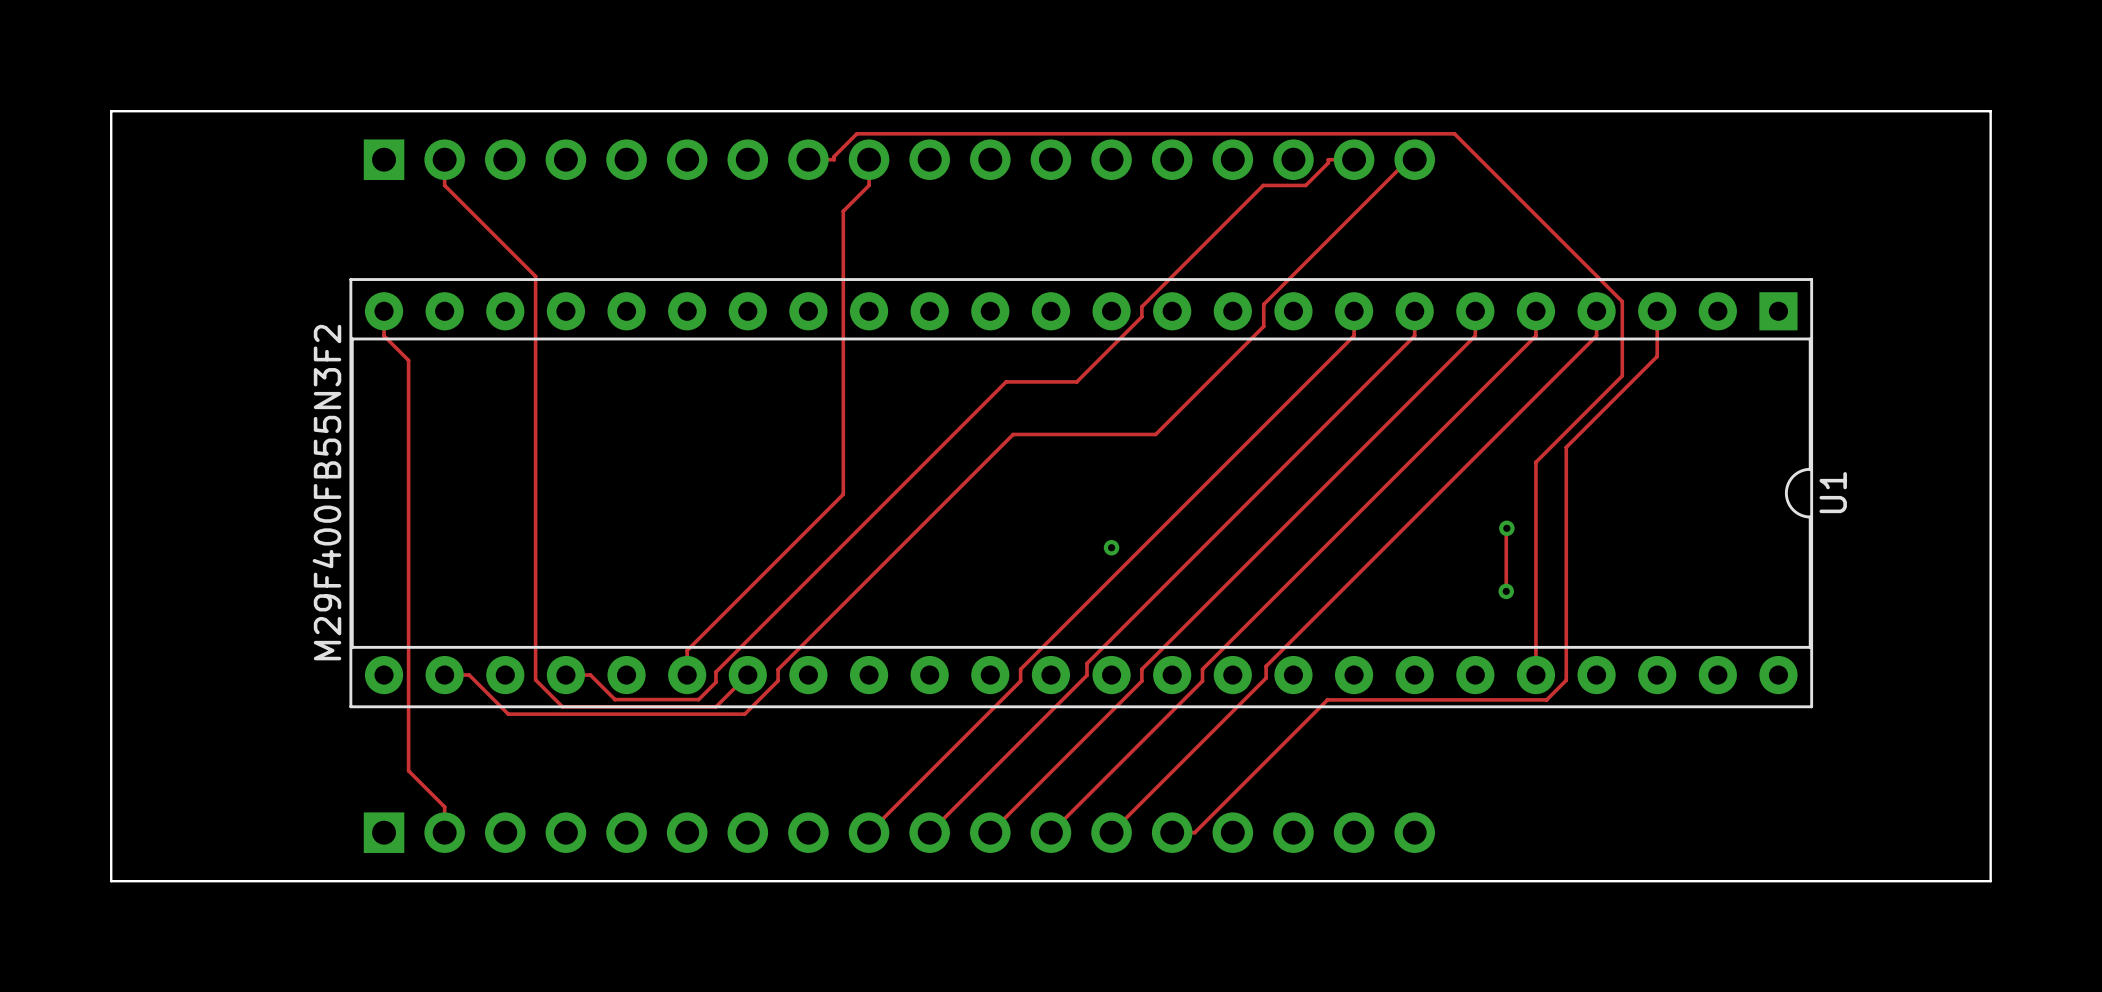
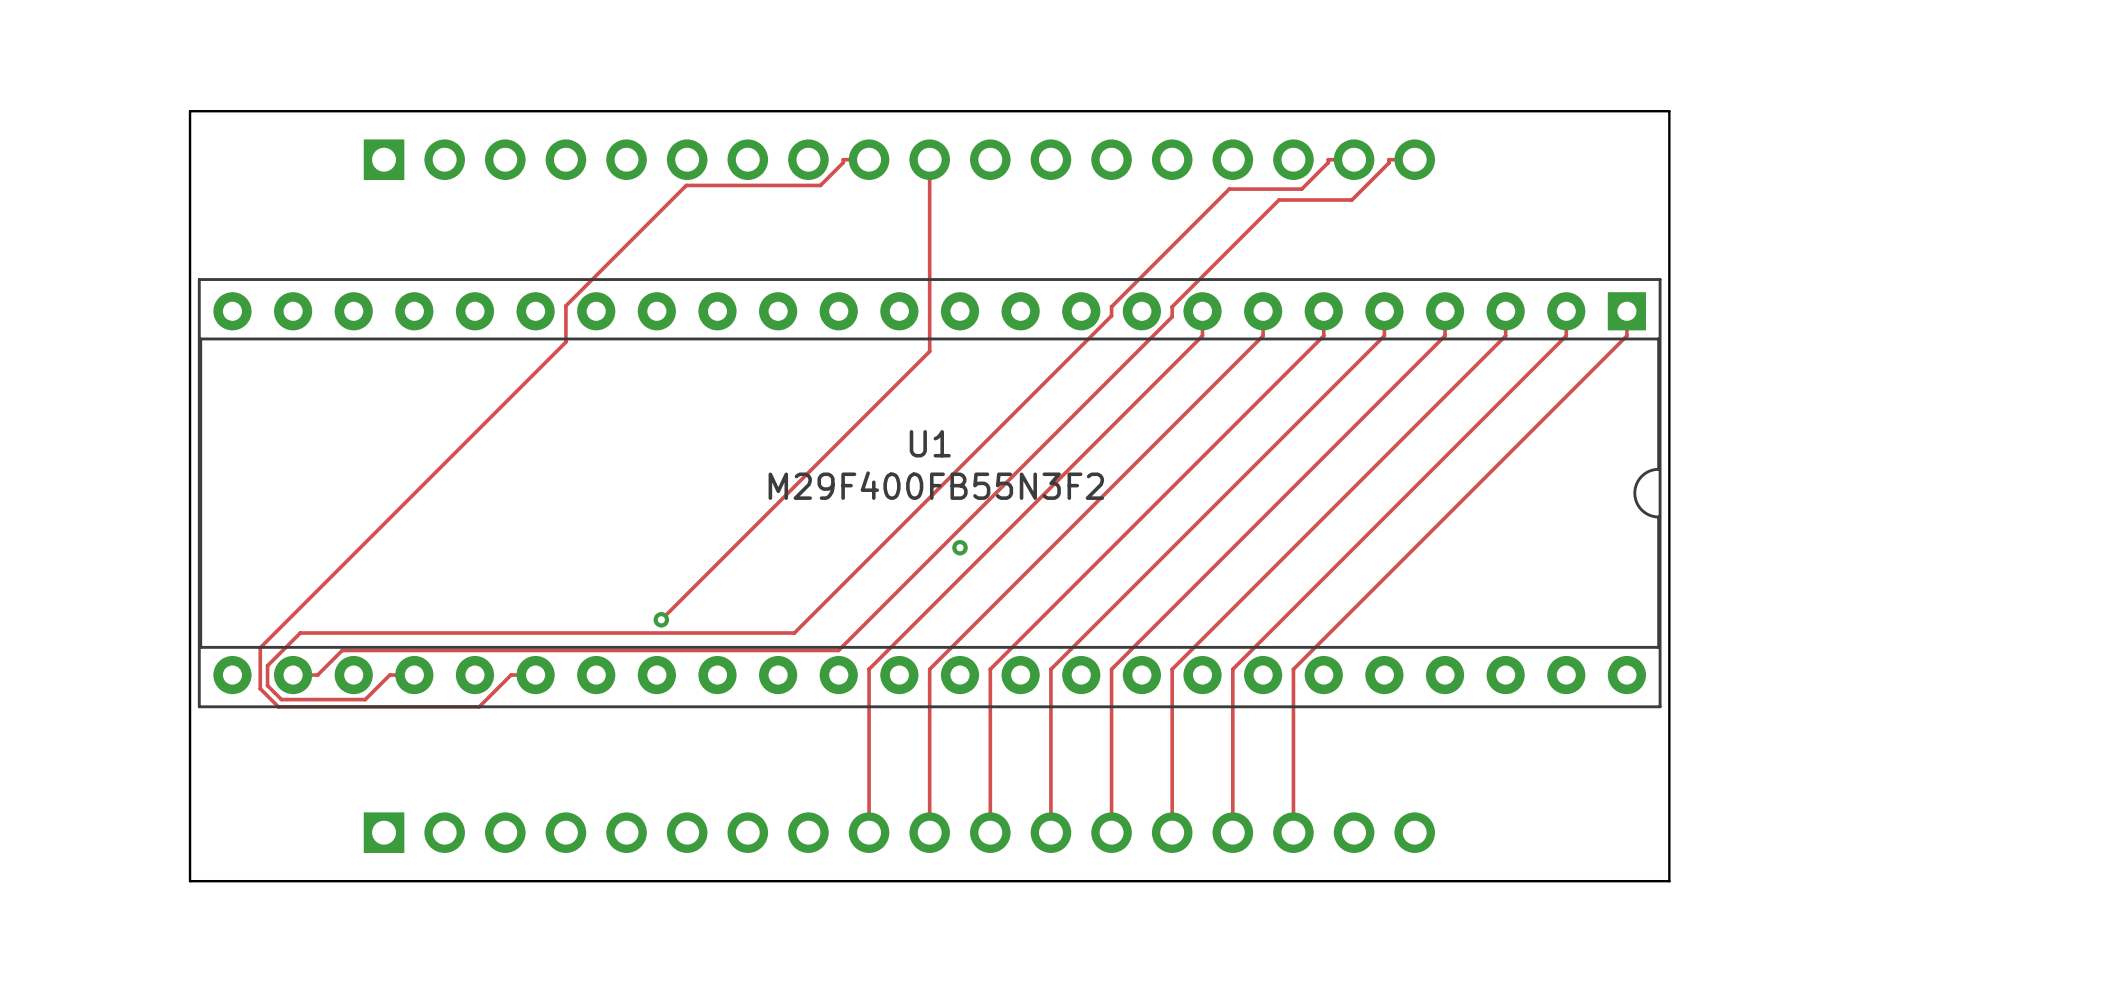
board edge: (190, 111) (111, 111) (111, 881) (190, 881) -> (190, 111) (190, 881)
board edge: (1669, 111) (1990, 111) (1990, 881) (1669, 881) -> (1669, 111) (1669, 881)
track: (444, 159) (444, 185) (535, 276) (535, 679) (562, 706) (715, 706) (747, 675) -> none
track: (808, 159) (834, 159) (834, 156) (856, 133) (1454, 133) (1622, 301) (1622, 375) (1535, 462) (1535, 675) -> none
track: (869, 159) (869, 185) (843, 211) (843, 494) (687, 650) (687, 675) -> (869, 159) (843, 159) (843, 162) (820, 185) (686, 185) (565, 305) (565, 342) (260, 647) (260, 688) (278, 706) (479, 706) (511, 675) (535, 675)
track: none -> (929, 159) (929, 351) (661, 619)
track: (1408, 159) (1263, 304) (1263, 326) (1155, 434) (1013, 434) (778, 669) (778, 680) (744, 714) (508, 714) (469, 675) (444, 675) -> (1408, 159) (1388, 159) (1388, 162) (1351, 200) (1278, 200) (1172, 306) (1172, 316) (838, 650) (342, 650) (317, 675) (293, 675)
track: (1328, 162) (1305, 185) (1263, 185) (1141, 306) (1141, 316) (1076, 381) (1006, 381) (715, 672) (715, 682) (698, 699) (615, 699) (590, 675) (565, 675) -> (1328, 162) (1301, 189) (1229, 189) (1111, 306) (1111, 315) (794, 633) (300, 633) (267, 665) (267, 685) (281, 699) (365, 699) (389, 675) (414, 675)
track: (384, 311) (384, 335) (408, 360) (408, 770) (444, 806) (444, 832) -> none
track: (1354, 311) (1354, 335) (1020, 669) (1020, 681) (869, 832) -> (1202, 311) (1202, 335) (869, 669) (869, 832)
track: (1414, 311) (1414, 335) (1087, 663) (1087, 675) (929, 832) -> (1263, 311) (1263, 335) (929, 669) (929, 832)
track: (1475, 311) (1475, 335) (1141, 669) (1141, 681) (990, 832) -> (1323, 311) (1323, 335) (990, 669) (990, 832)
track: (1535, 311) (1535, 335) (1202, 669) (1202, 681) (1050, 832) -> (1384, 311) (1384, 335) (1050, 669) (1050, 832)
track: none -> (1566, 311) (1566, 335) (1232, 669) (1232, 832)
track: (1596, 311) (1596, 335) (1266, 666) (1266, 678) (1111, 832) -> (1445, 311) (1445, 335) (1111, 669) (1111, 832)
track: none -> (1626, 311) (1626, 335) (1293, 669) (1293, 832)
track: (1657, 311) (1657, 356) (1566, 447) (1566, 680) (1546, 699) (1327, 699) (1194, 832) (1172, 832) -> (1505, 311) (1505, 335) (1172, 669) (1172, 832)
U1 value rotation: 0° (326, 492) -> 90° clockwise (936, 485)
U1 value position: M29F400FB55N3F2 (326, 492) -> M29F400FB55N3F2 (936, 485)
U1 name rotation: 0° (1833, 492) -> 90° clockwise (930, 443)
U1 name position: U1 (1833, 492) -> U1 (930, 443)
U1 position: (1081, 493) -> (929, 493)
track: (1506, 528) (1506, 591) -> none
via: (1506, 528) -> none
via: none -> (959, 547)
via: (1111, 547) -> none
via: (1506, 591) -> none
via: none -> (661, 619)

